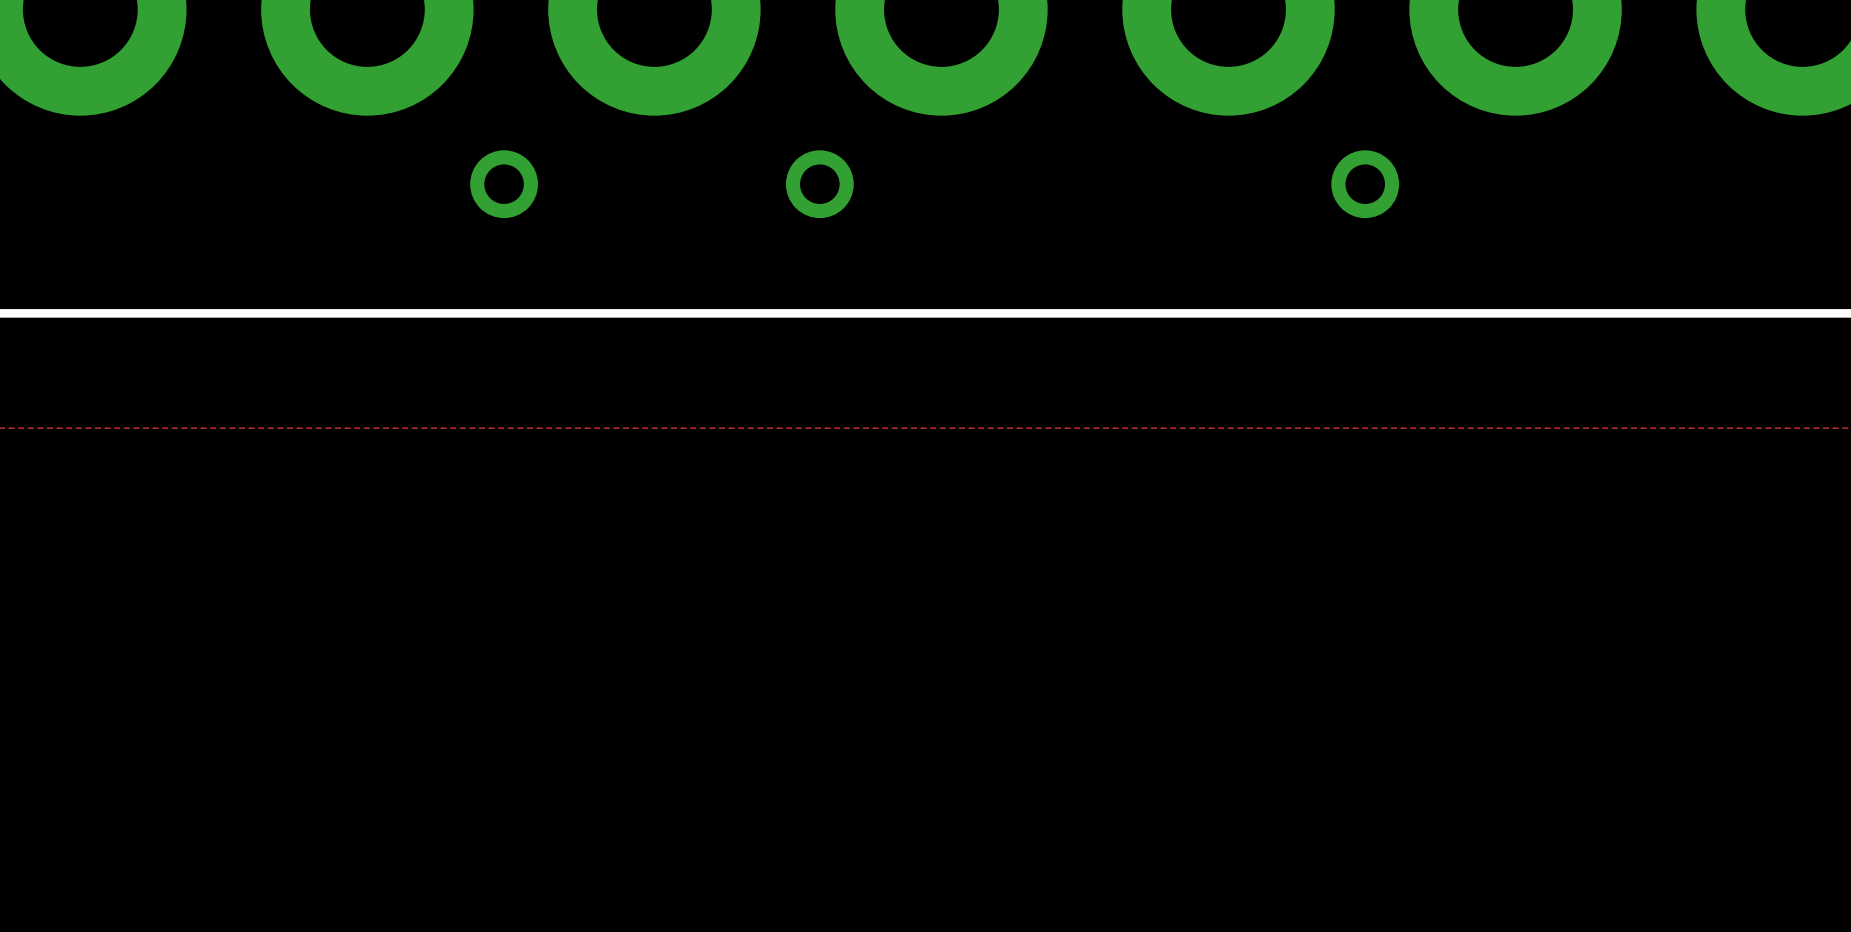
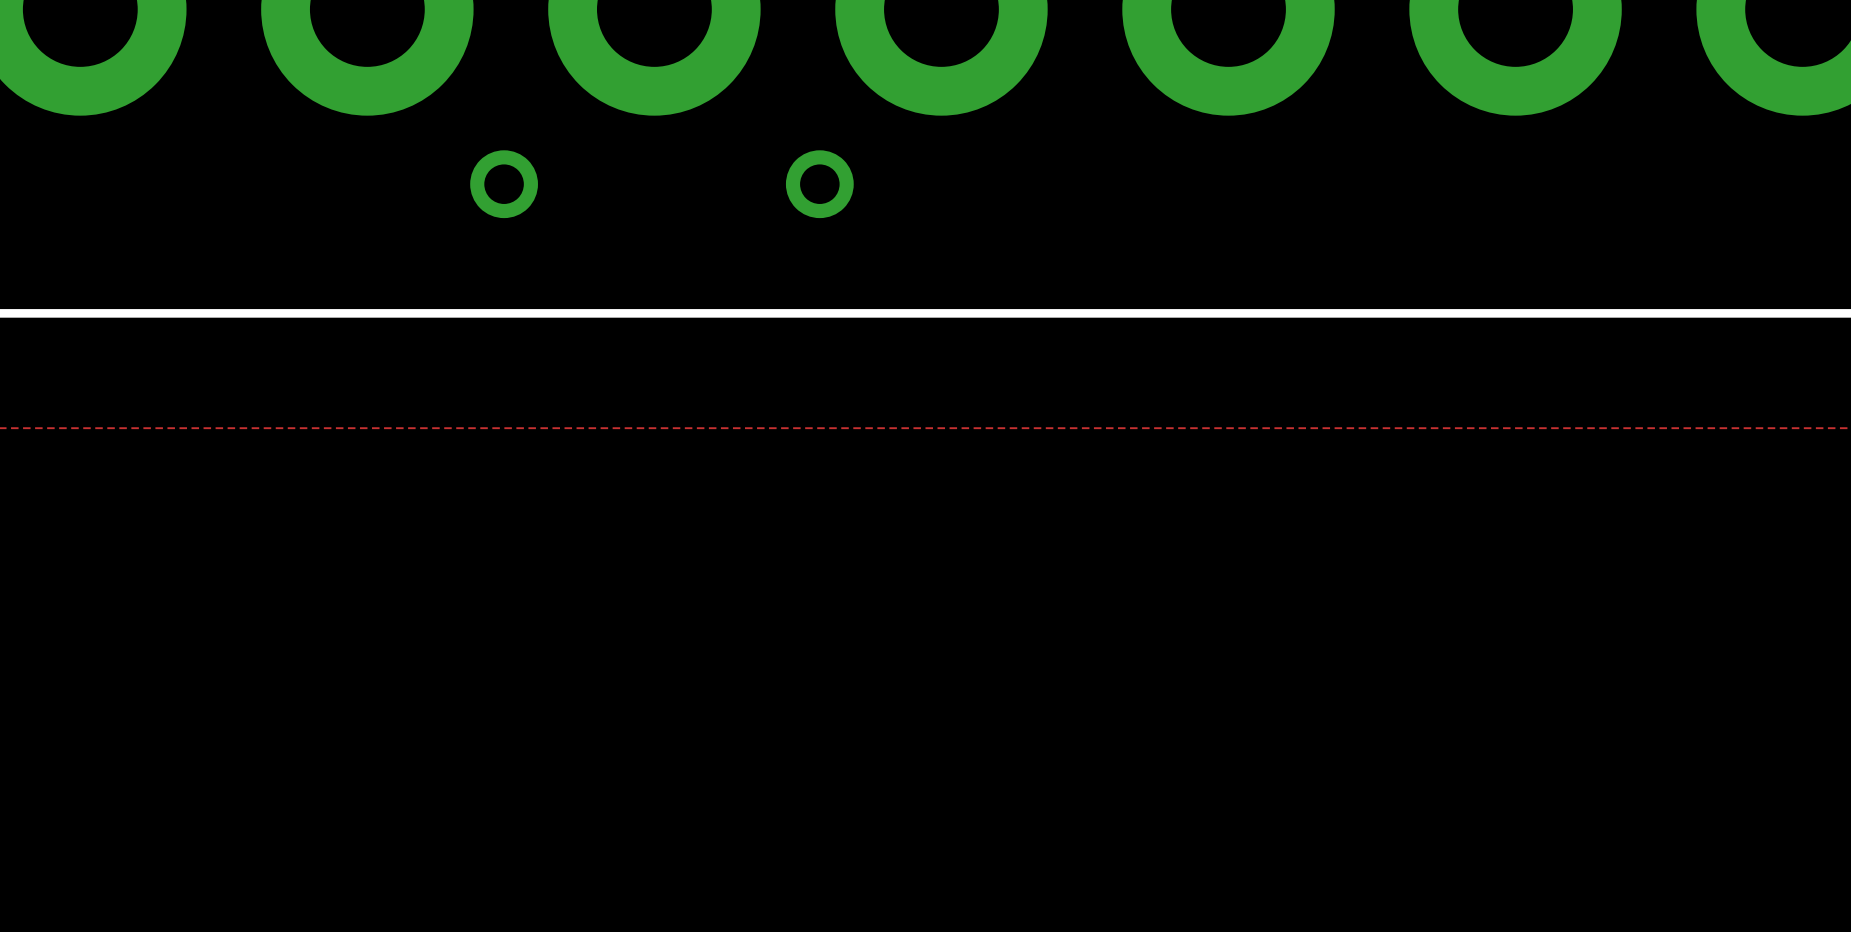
via: (1365, 184) -> none

